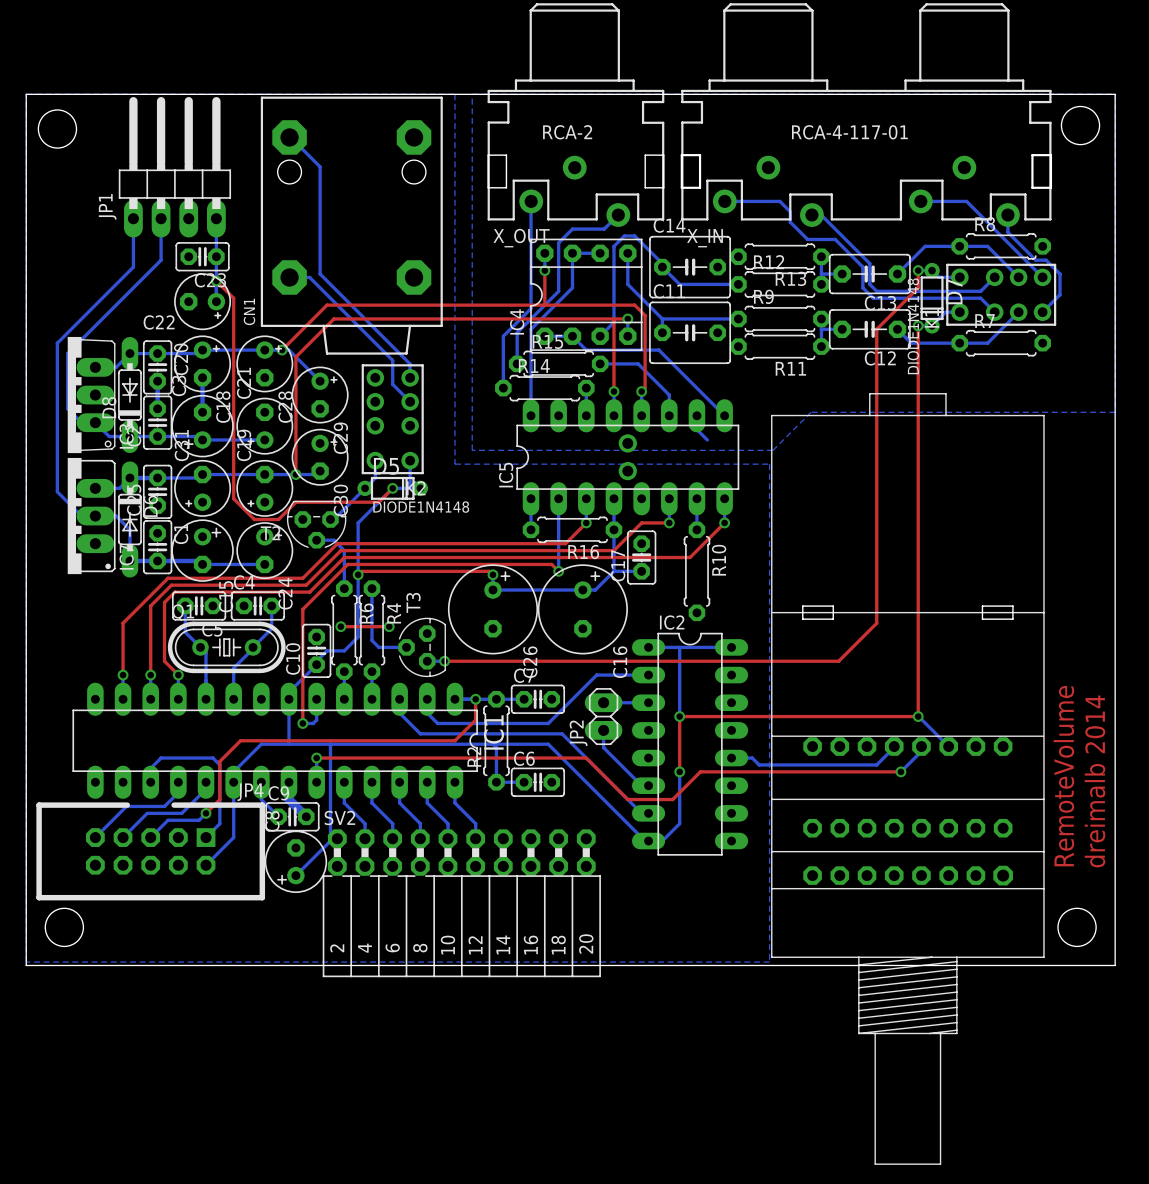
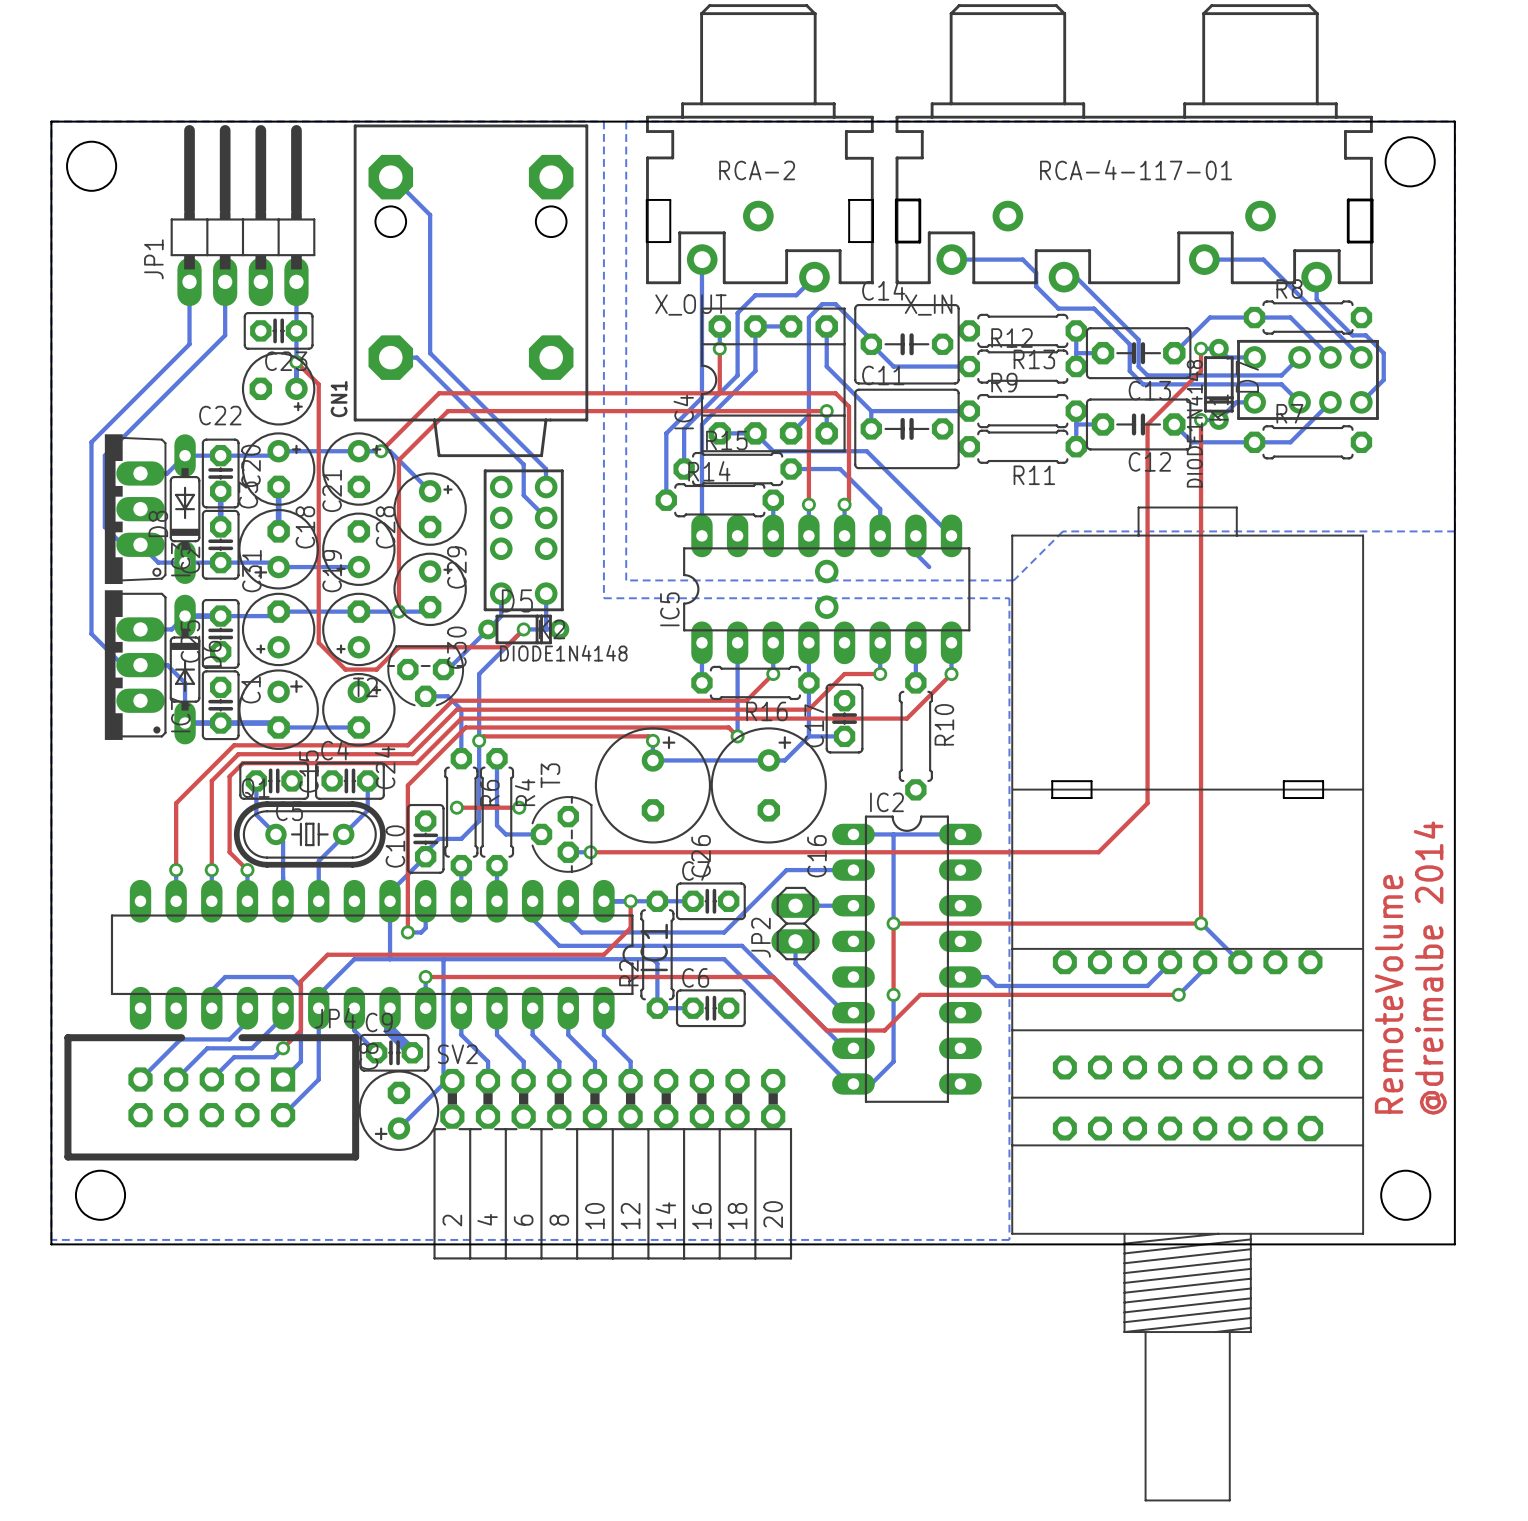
text: dreimalb 2014 (1095, 781) -> @dreimalbe 2014 (1430, 968)

